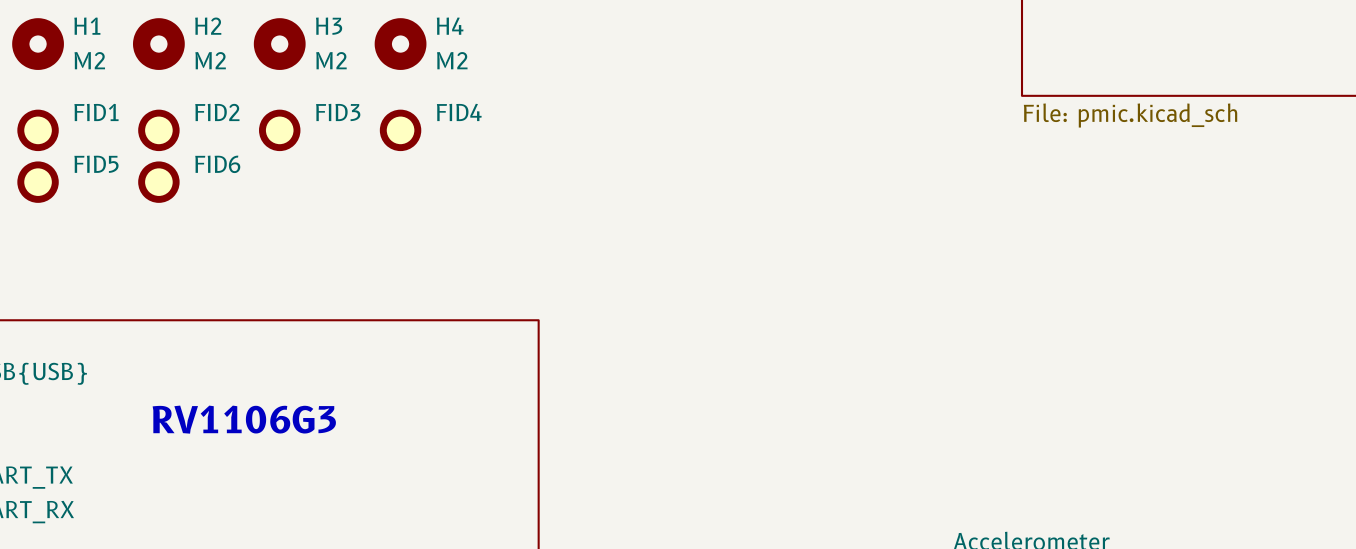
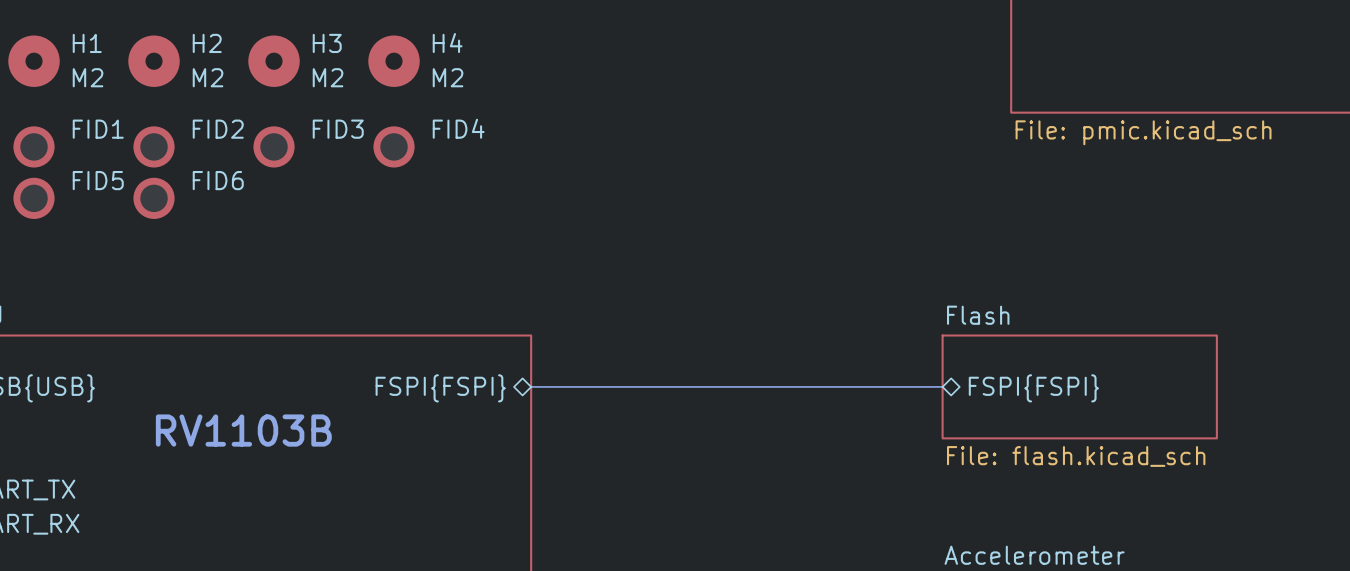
bus: none -> (531, 386) (942, 386)
sheet Flash: none -> File: flash.kicad_sch (1079, 386)
sheet pin: none -> FSPI{FSPI} (440, 388)
sheet pin: none -> FSPI{FSPI} (1033, 388)
text: RV1106G3 (244, 419) -> RV1103B (243, 430)

